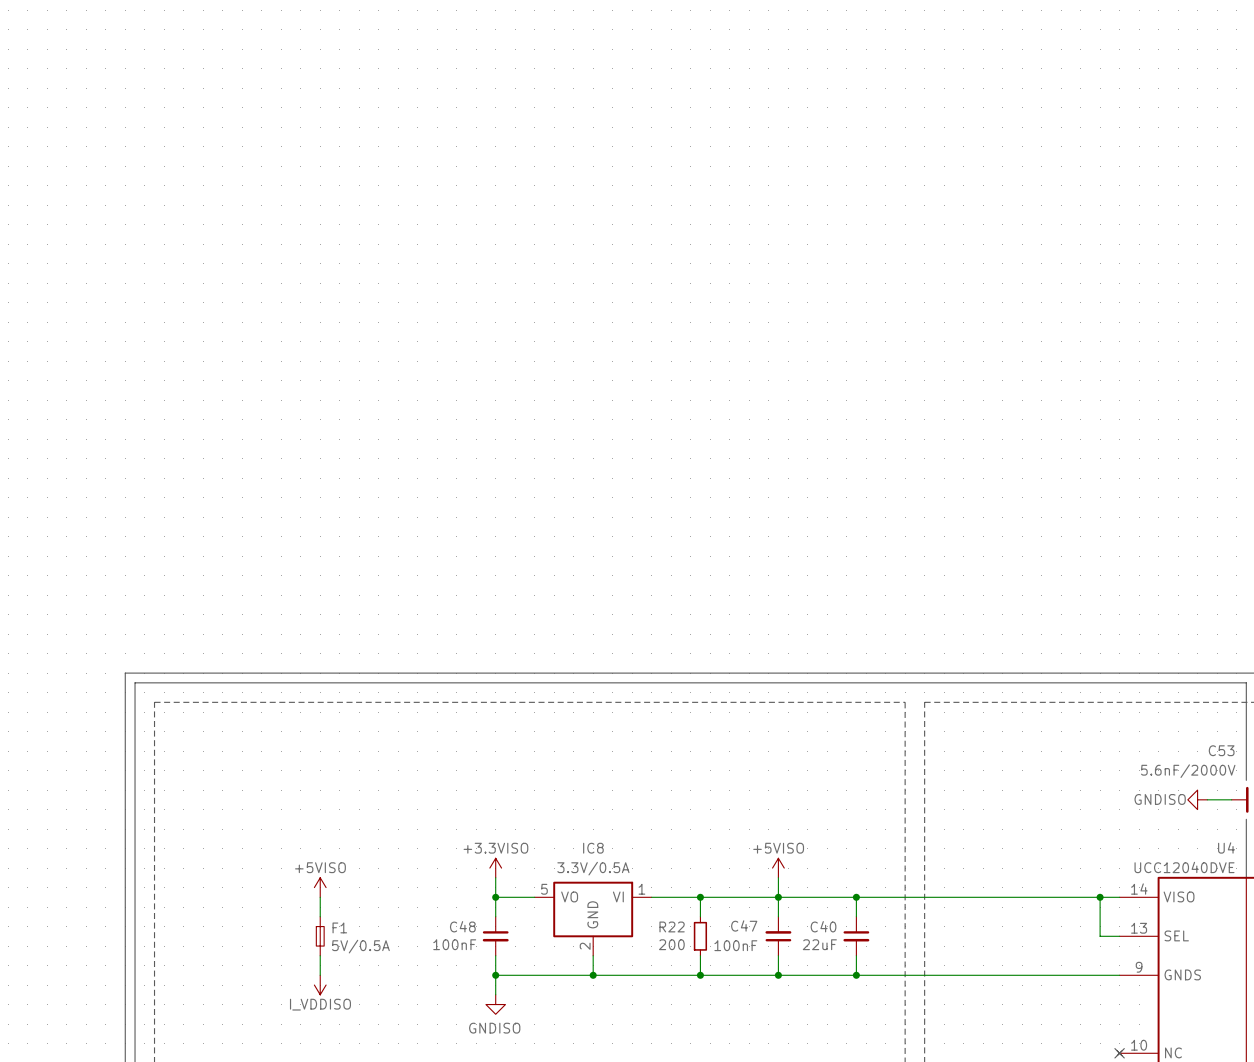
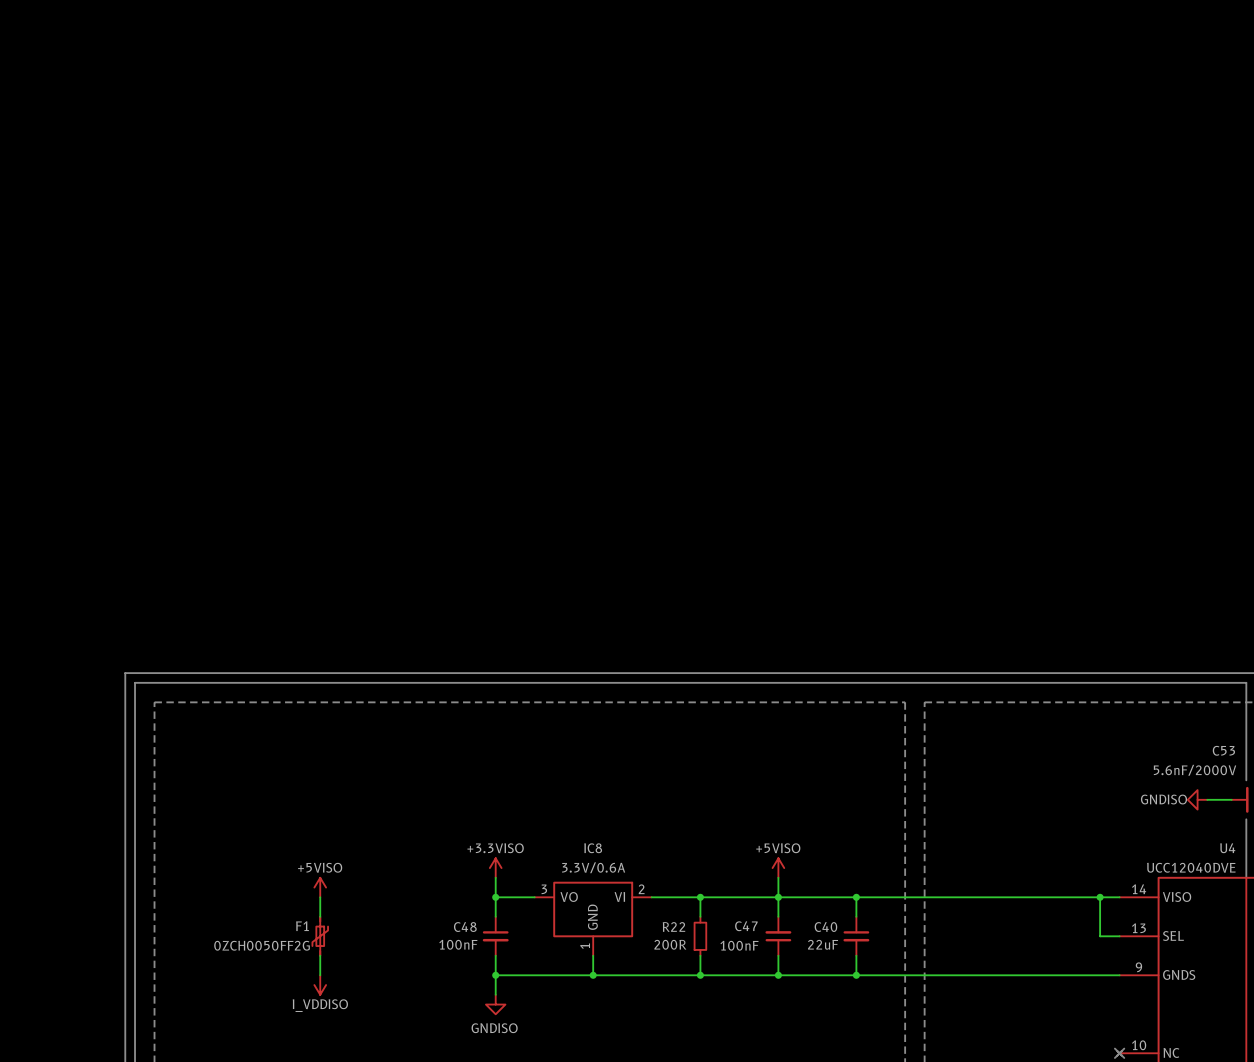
IC8 value: 3.3V/0.5A (593, 868) -> 3.3V/0.6A (593, 867)
IC8 pin number: 5 (544, 889) -> 3 (544, 889)
IC8 pin number: 1 (641, 889) -> 2 (641, 889)
F1 symbol: [316, 916, 325, 956] -> [312, 916, 329, 956]
F1 name position: F1 (339, 927) -> F1 (302, 926)
R22 value: 200 (671, 944) -> 200R (670, 944)
F1 value: 5V/0.5A (360, 946) -> 0ZCH0050FF2G (262, 945)
IC8 pin number: 2 (585, 946) -> 1 (585, 946)

